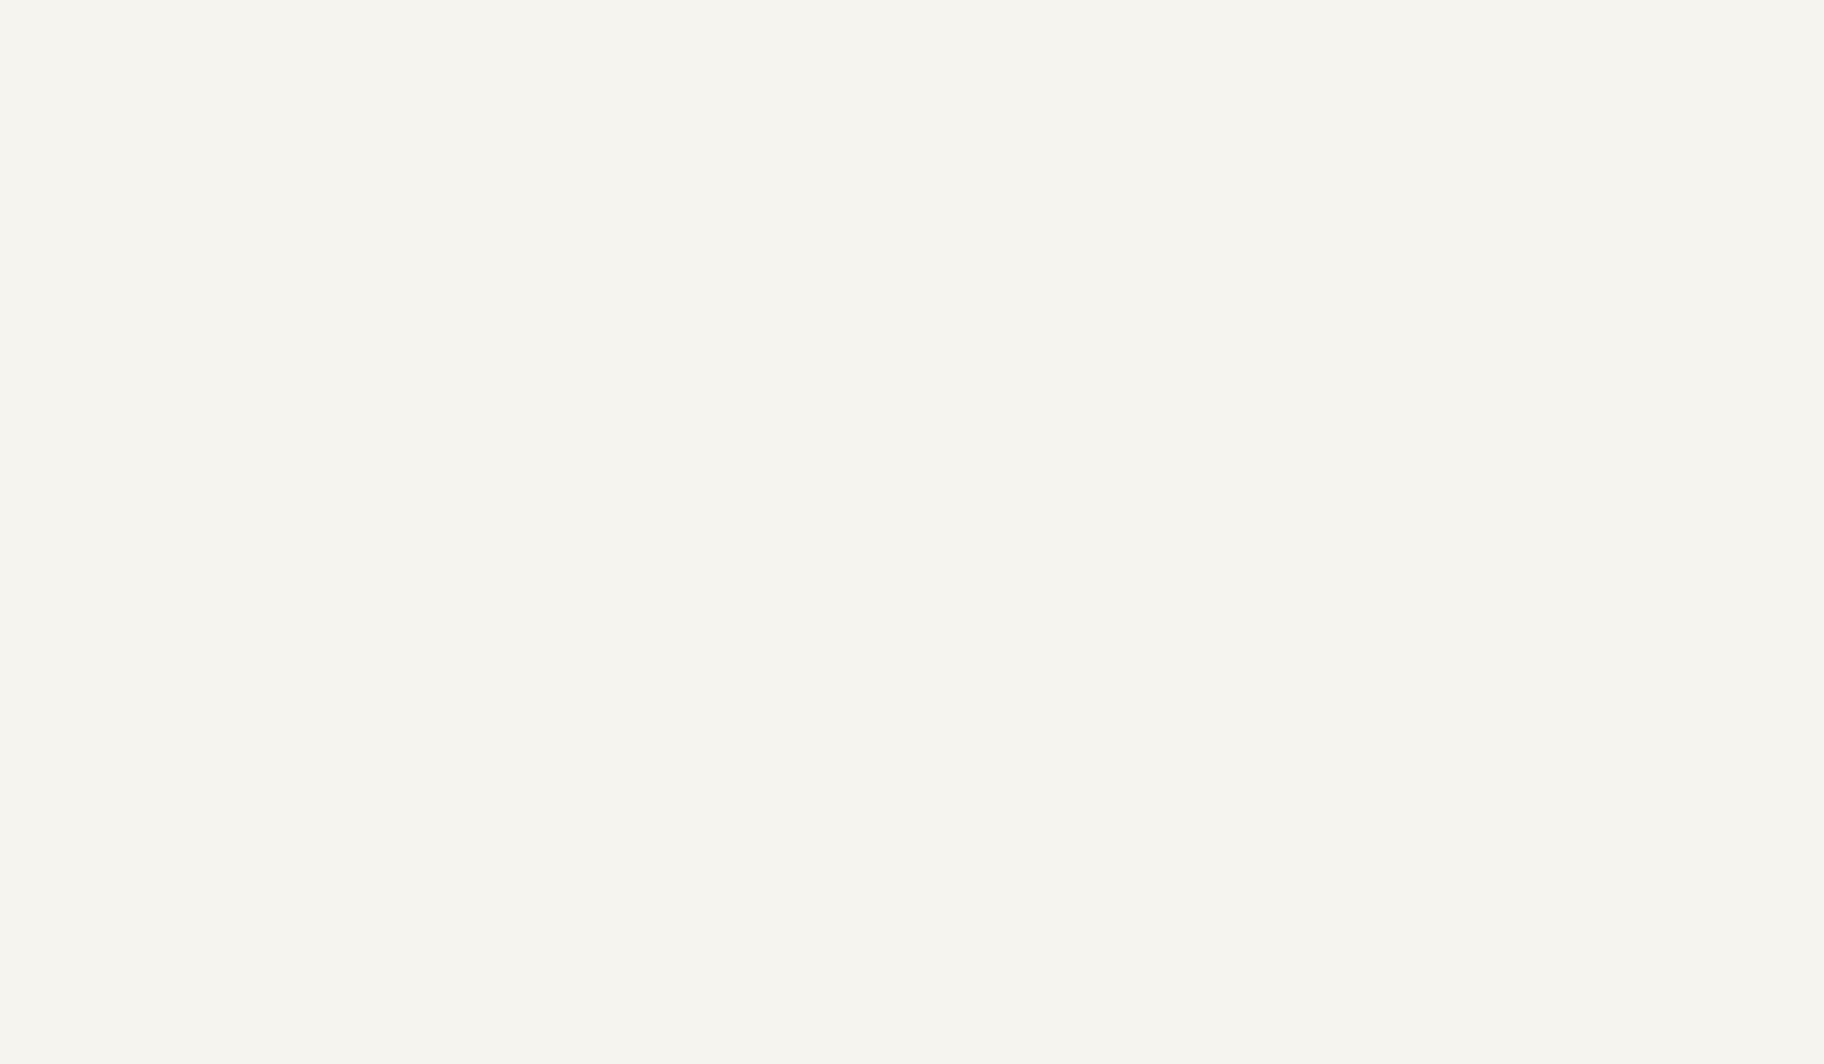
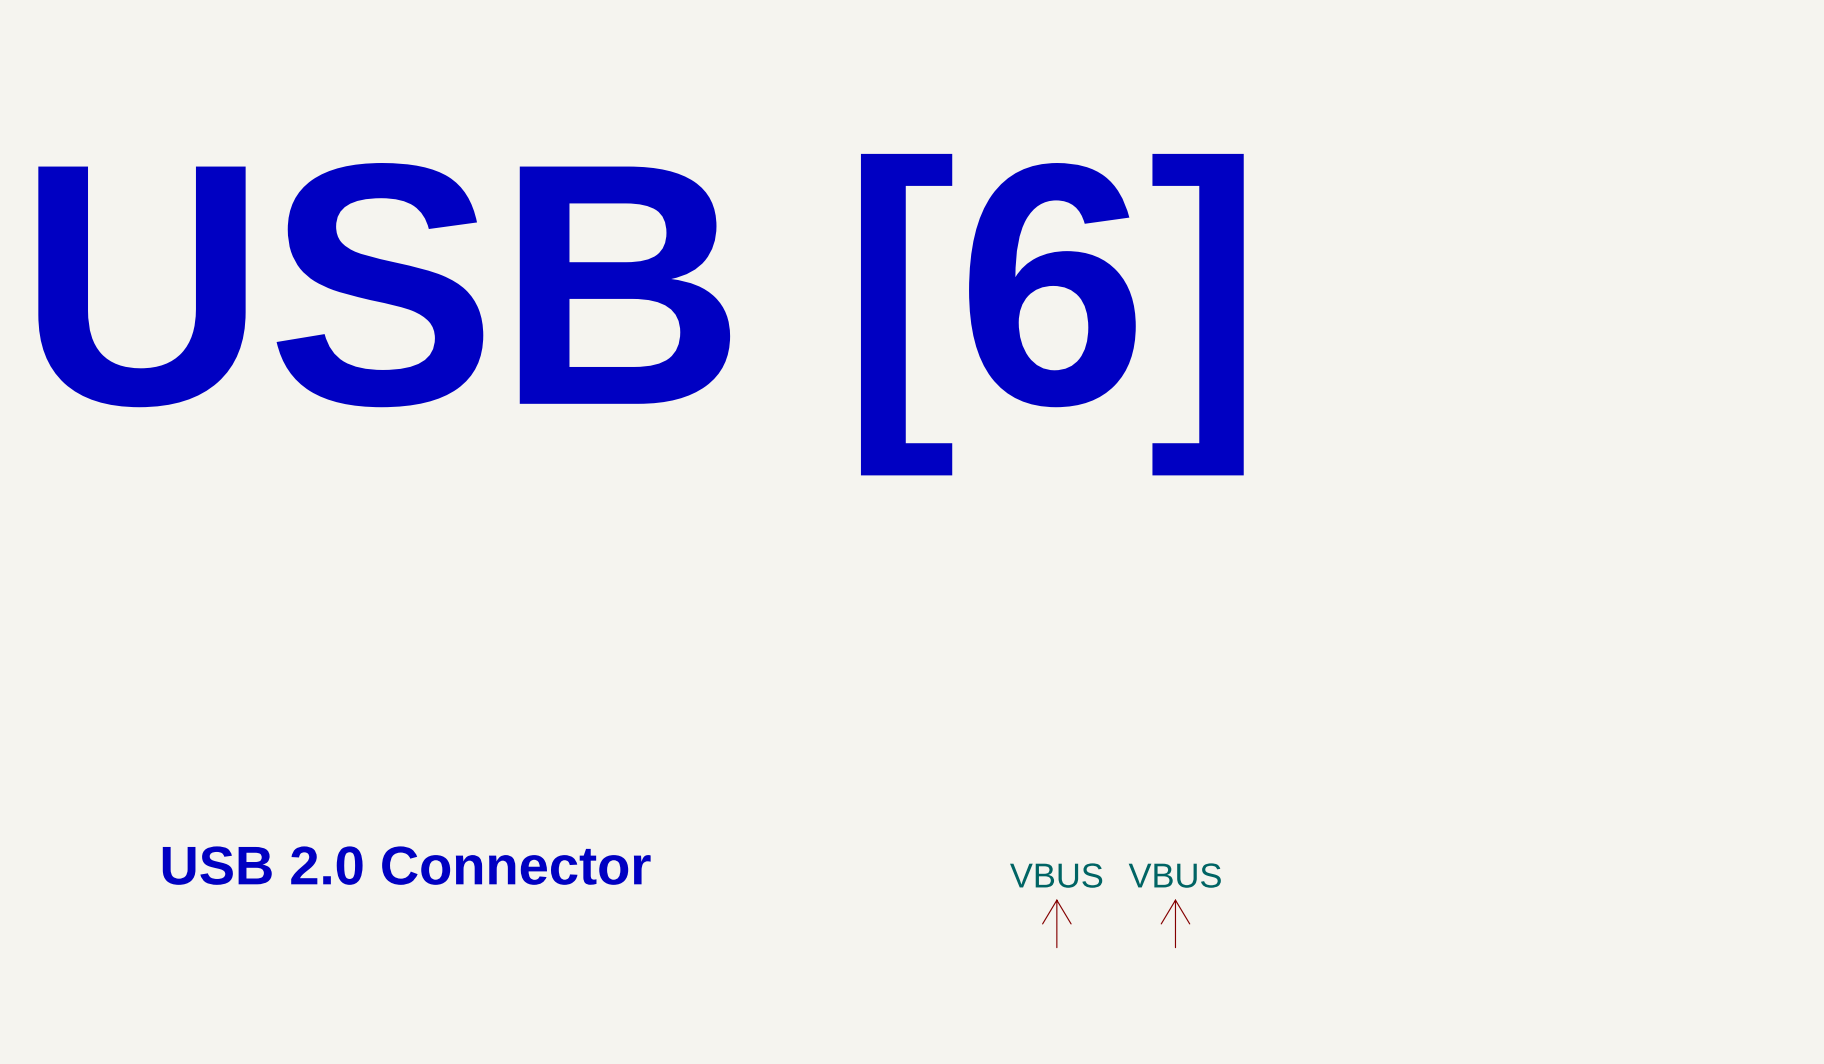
text: none -> USB [6] (641, 314)
text: none -> USB 2.0 Connector (406, 865)
power symbol: none -> VBUS (1056, 923)
power symbol: none -> VBUS (1175, 923)

